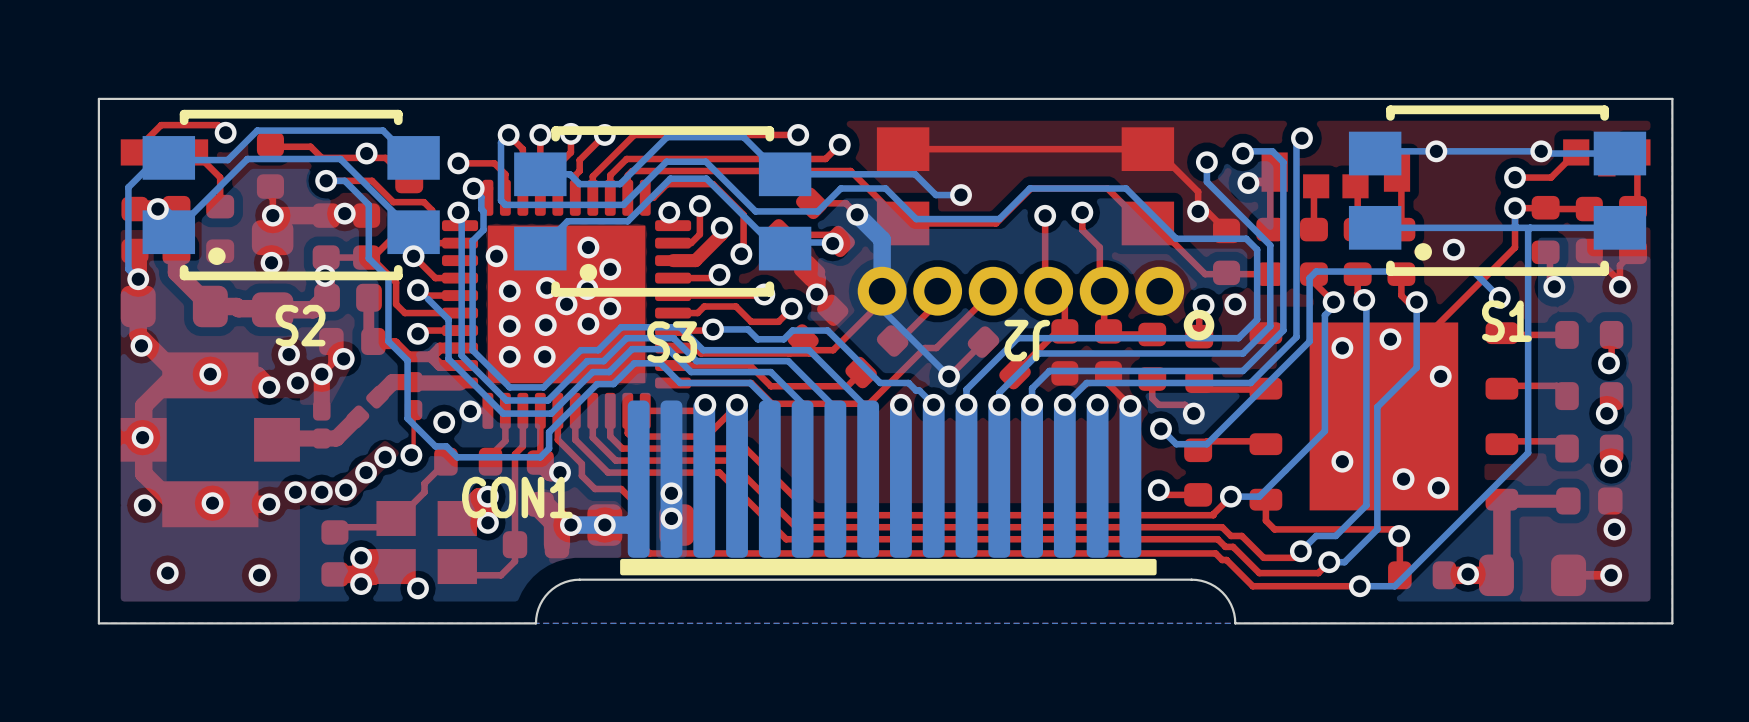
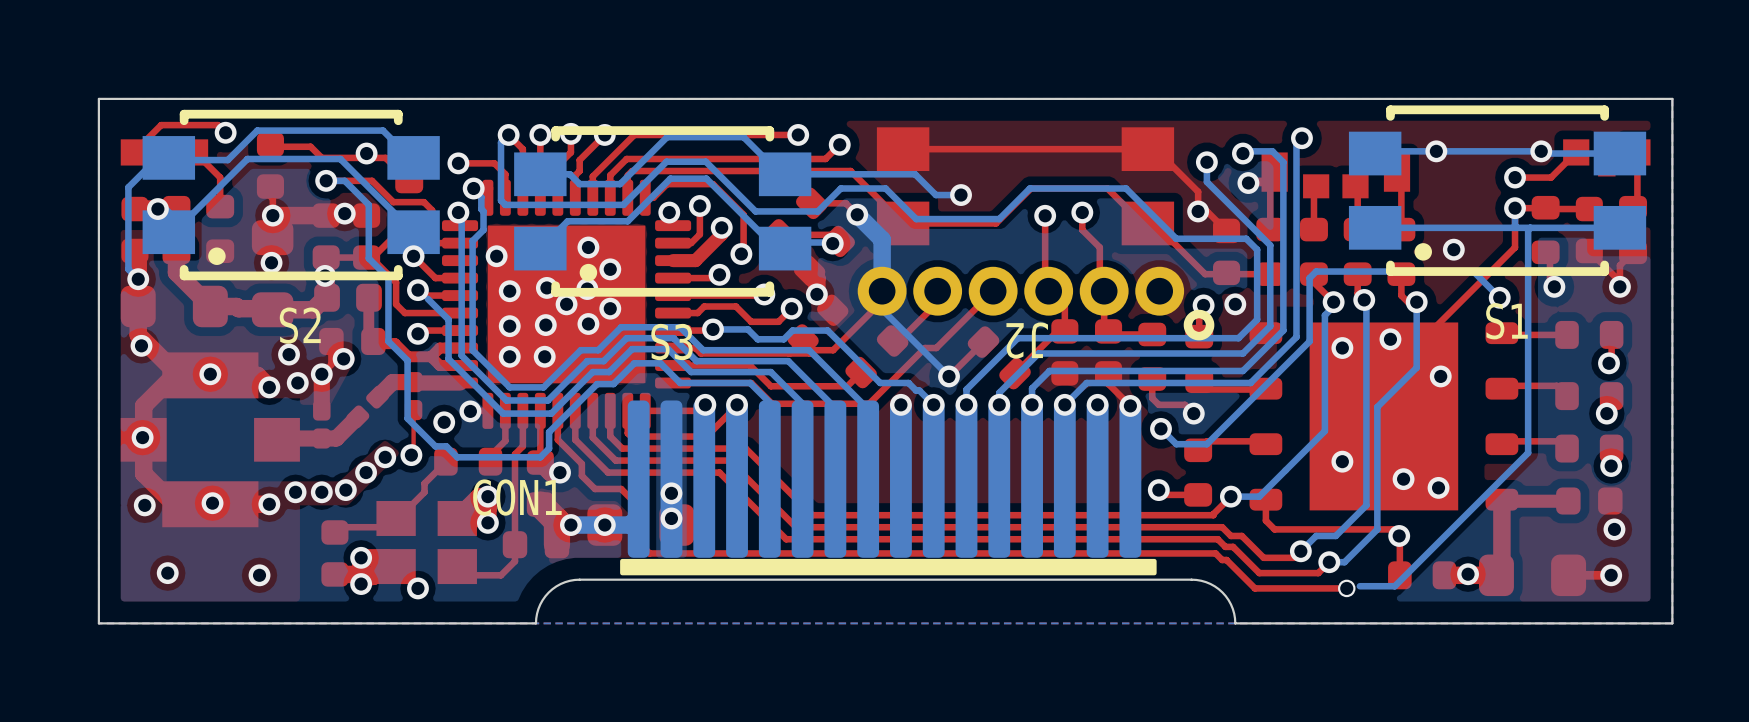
top track: (1359, 586) (1252, 586) -> (1346, 588) (1254, 588) (1252, 586)
via position: (1359, 586) -> (1346, 588)

